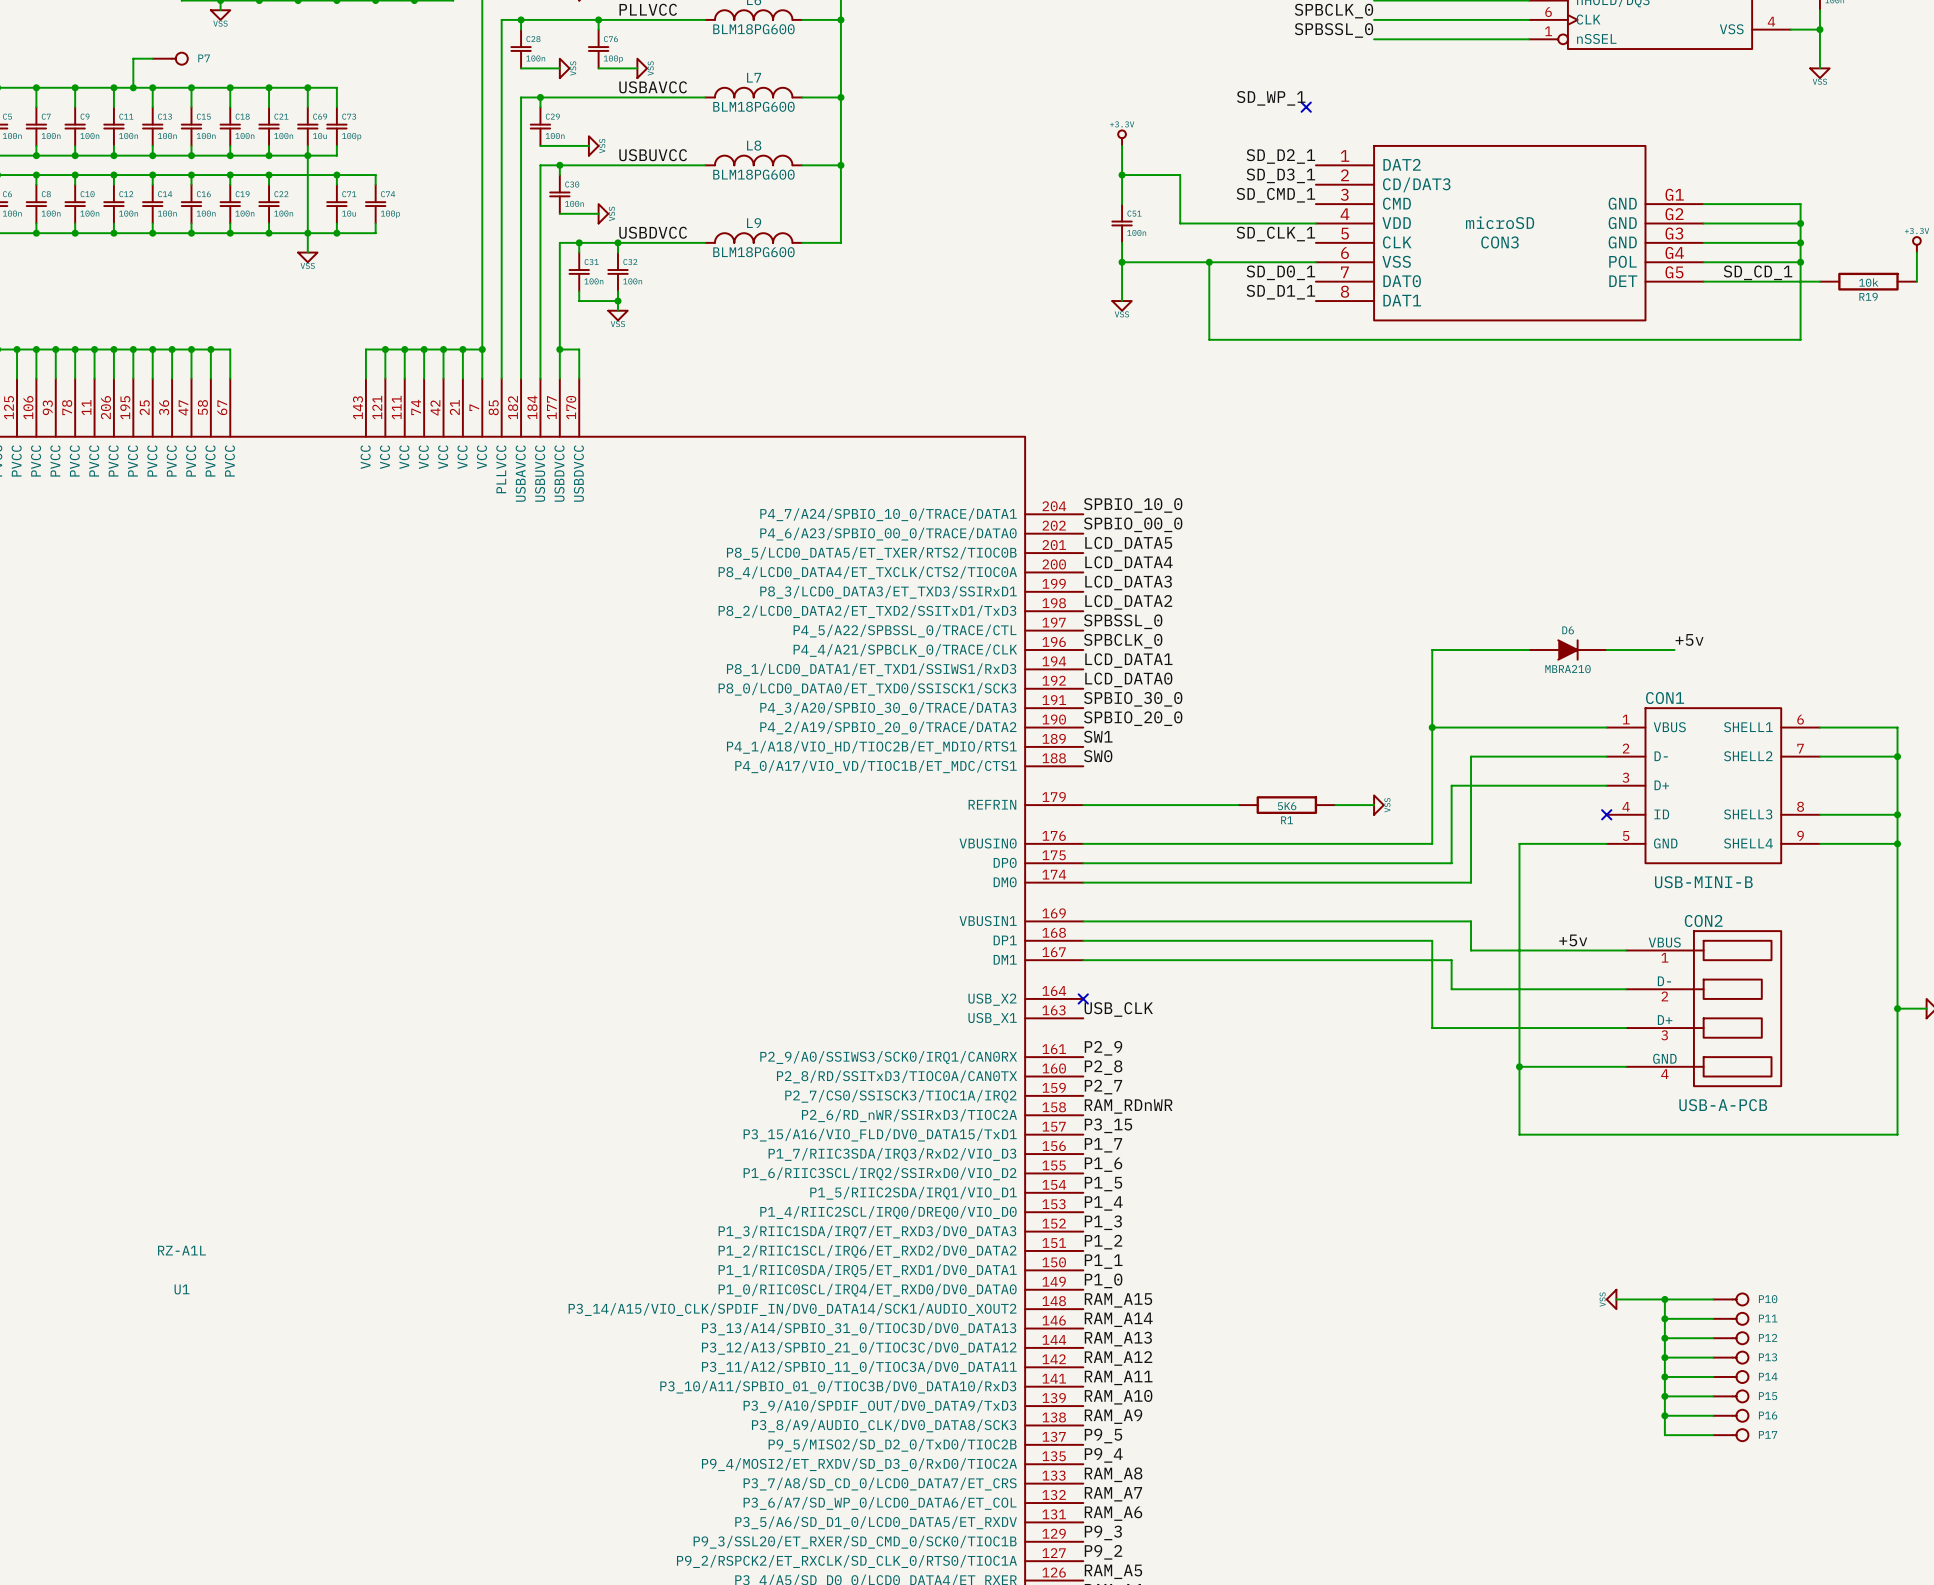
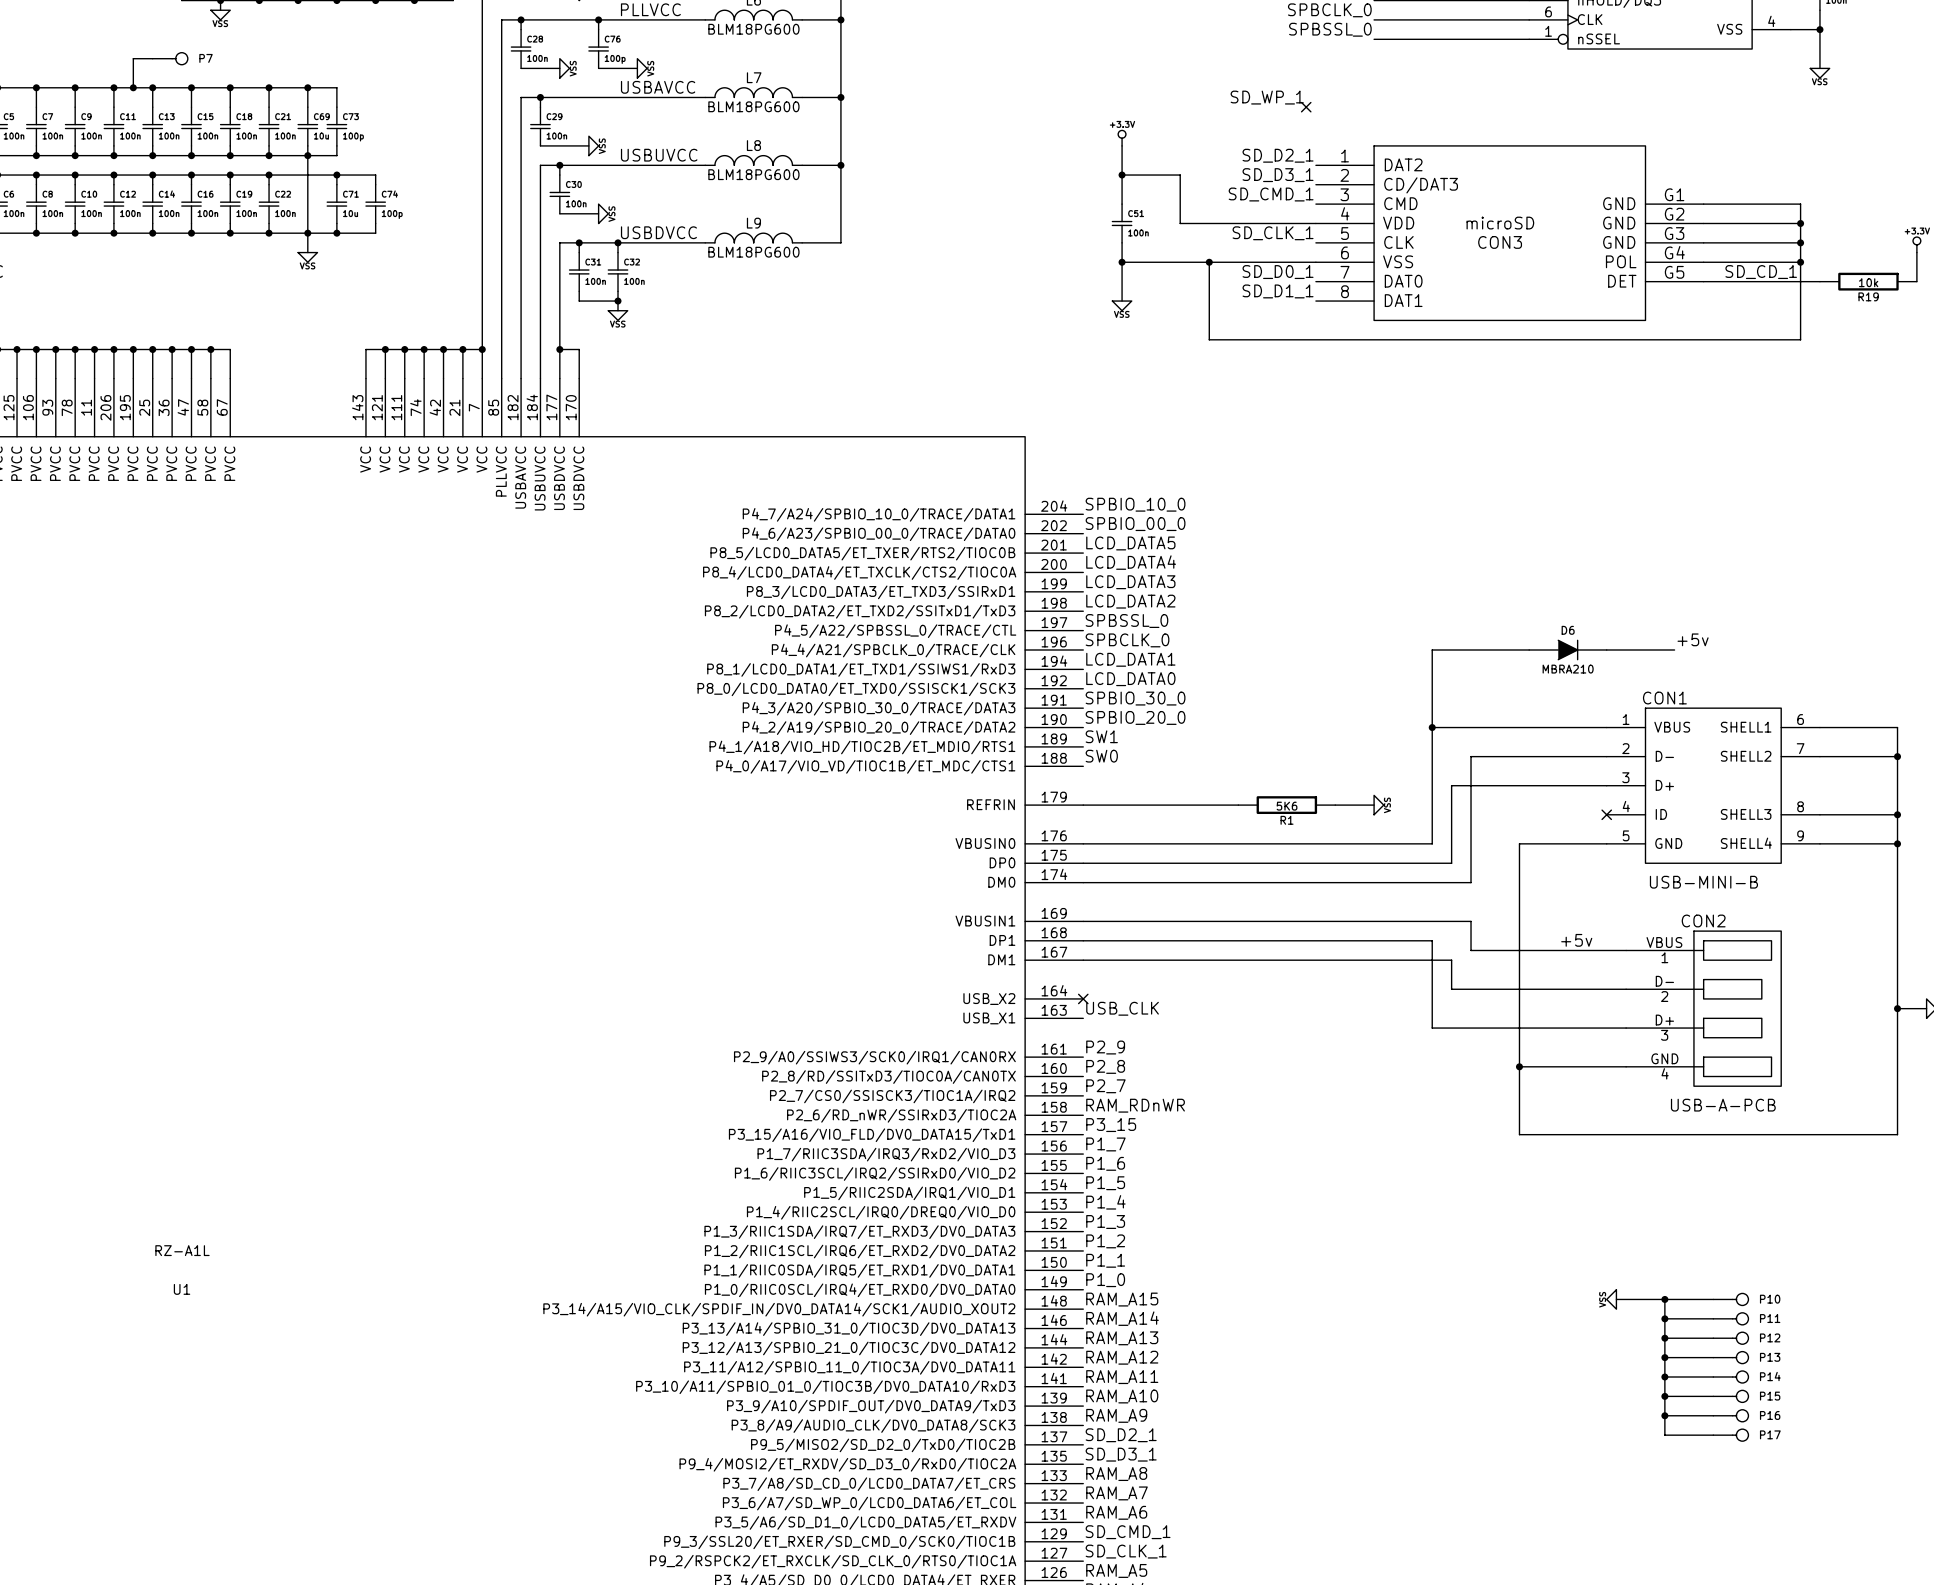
label: P9_5 (1103, 1436) -> SD_D2_1 (1121, 1435)
label: P9_4 (1103, 1455) -> SD_D3_1 (1121, 1454)
label: P9_3 (1103, 1532) -> SD_CMD_1 (1128, 1532)
label: P9_2 (1103, 1552) -> SD_CLK_1 (1126, 1551)

